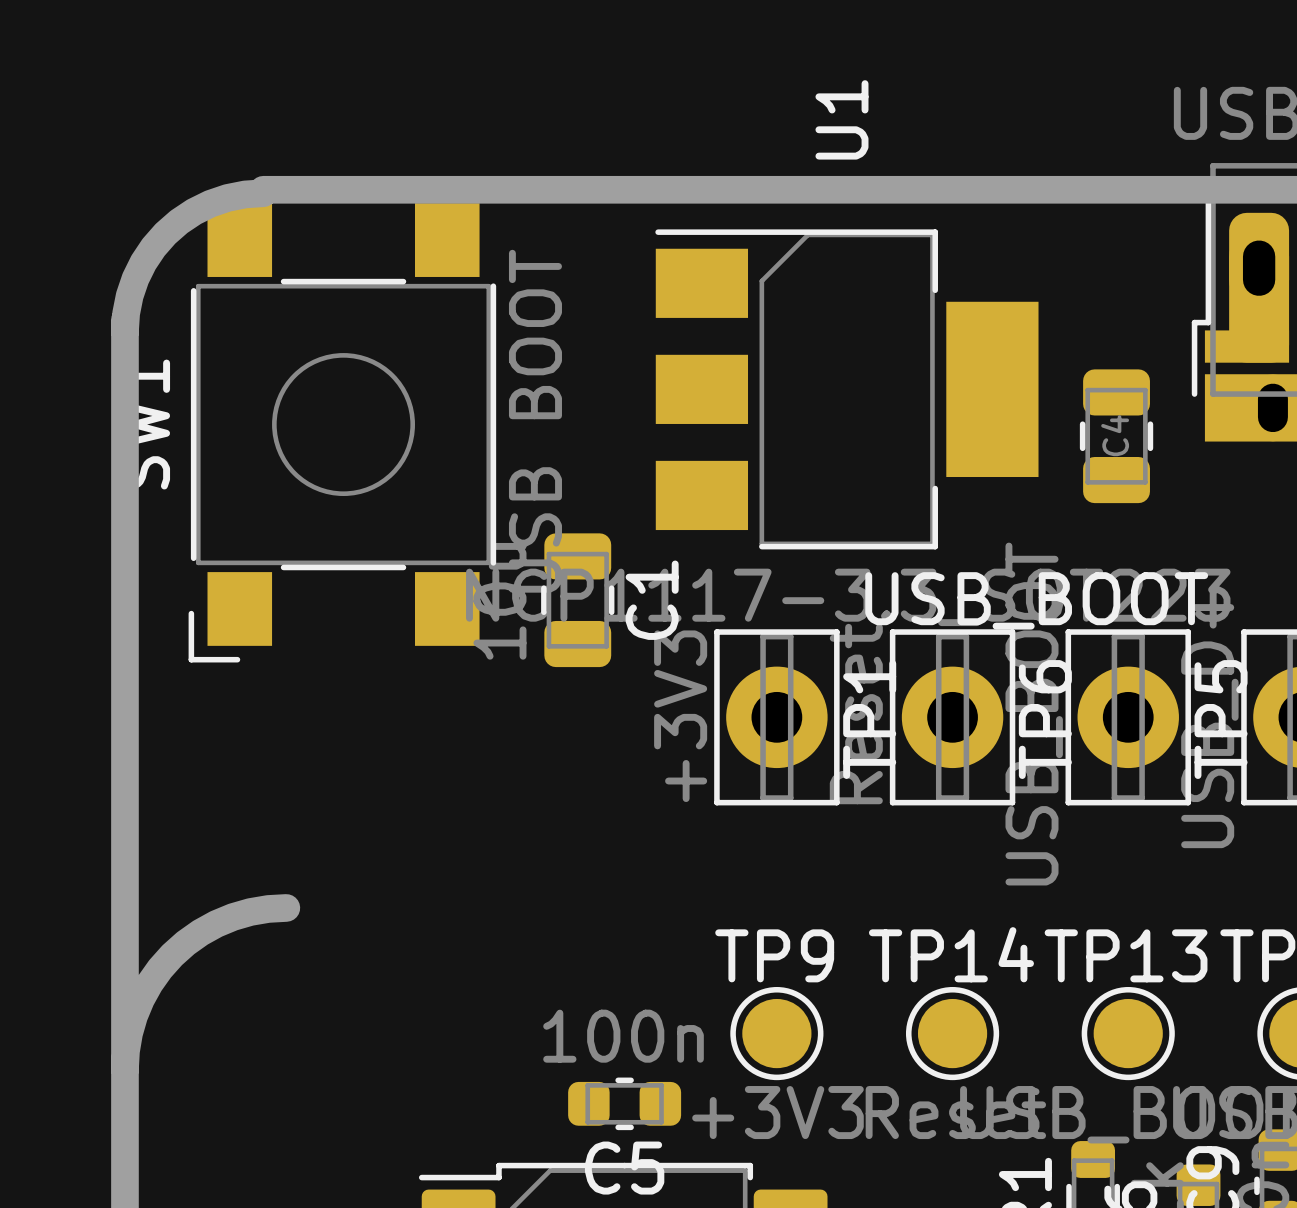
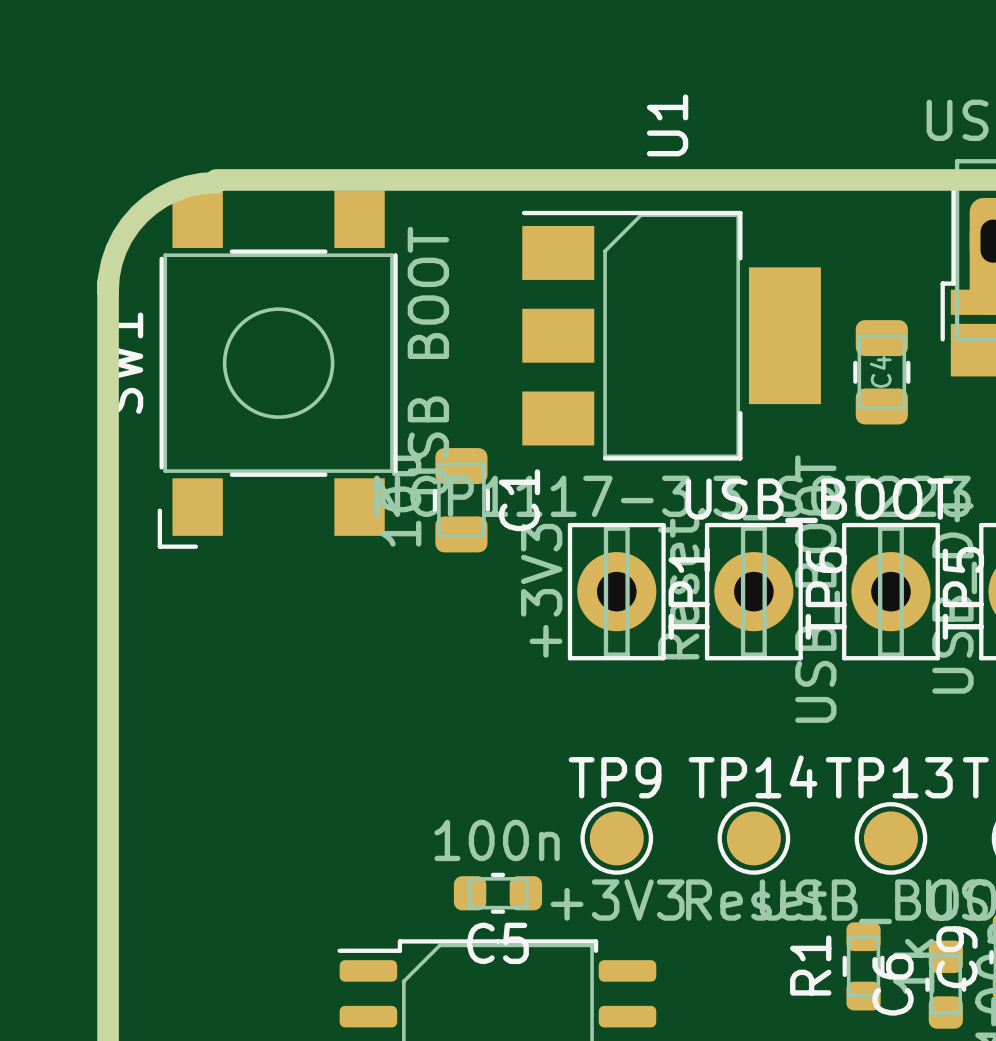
board edge: (286, 907) (268, 908) (233, 917) (200, 932) (172, 955) (149, 983) (134, 1016) (125, 1051) (124, 1069) -> none

